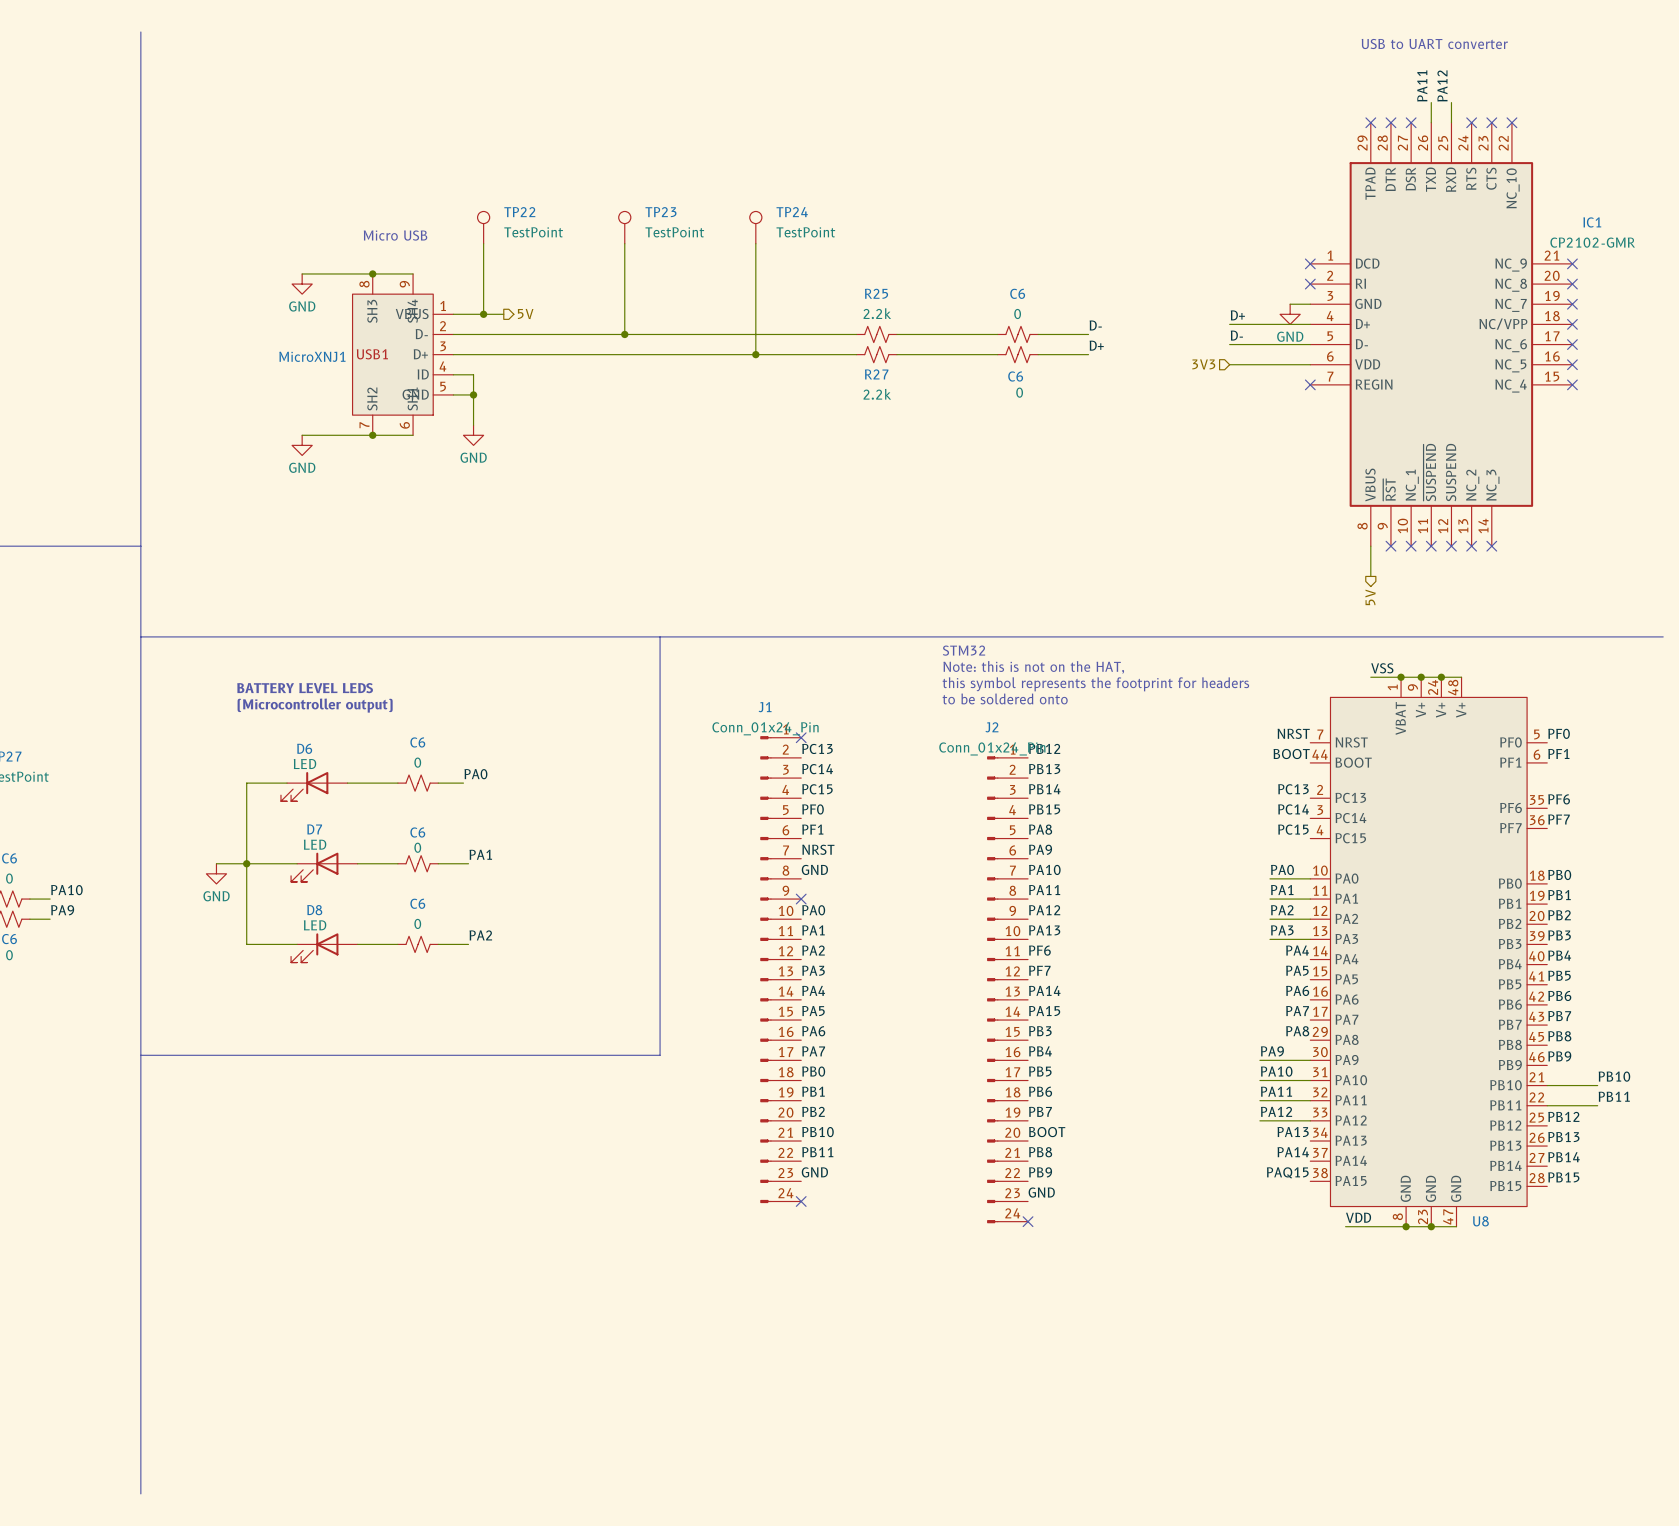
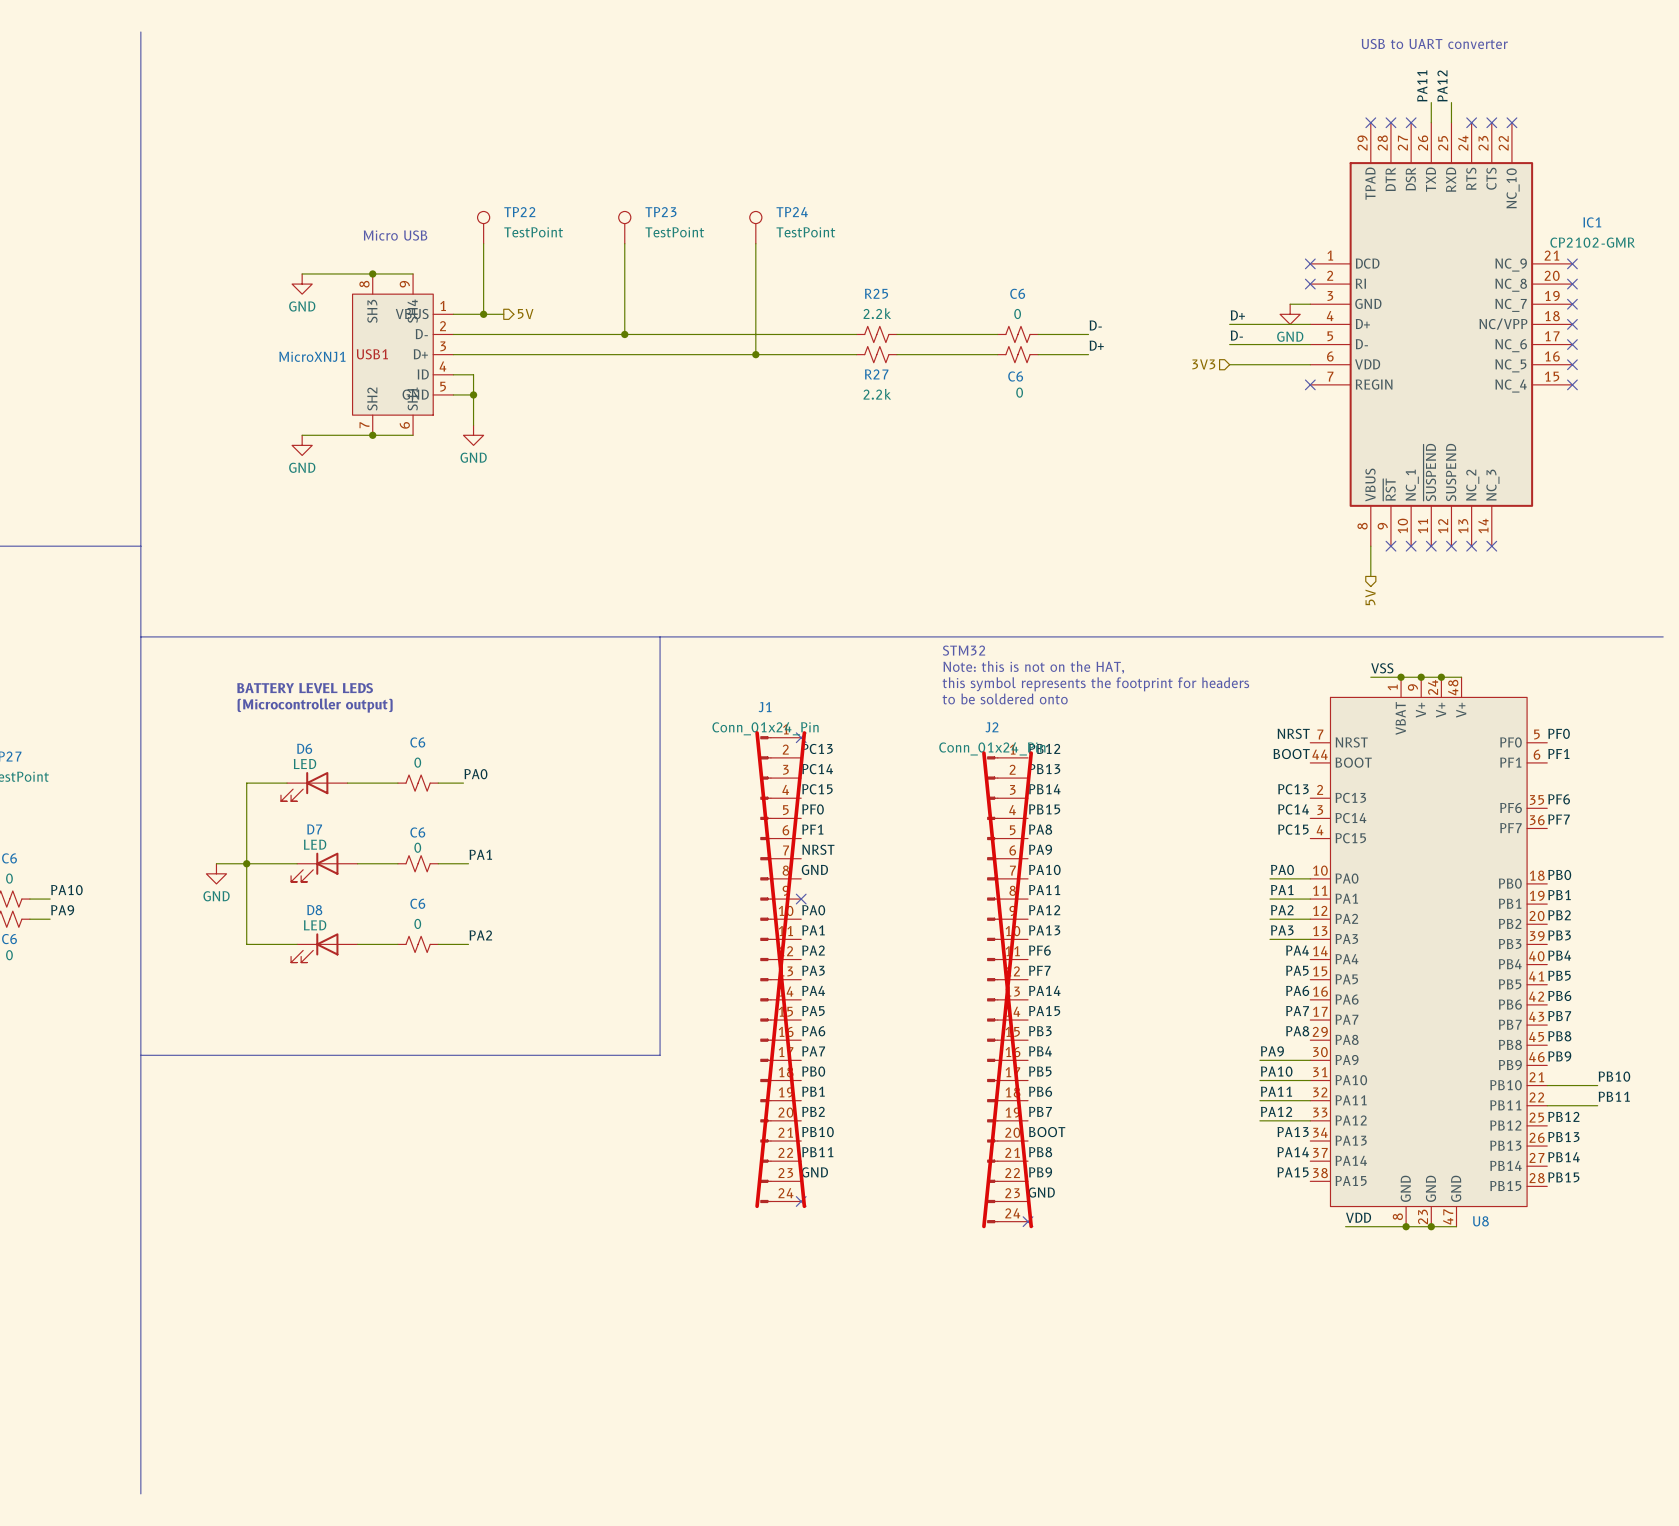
J1 do-not-place cross: none -> (780, 969)
J2 do-not-place cross: none -> (1007, 989)
label: PAQ15 (1287, 1172) -> PA15 (1293, 1172)

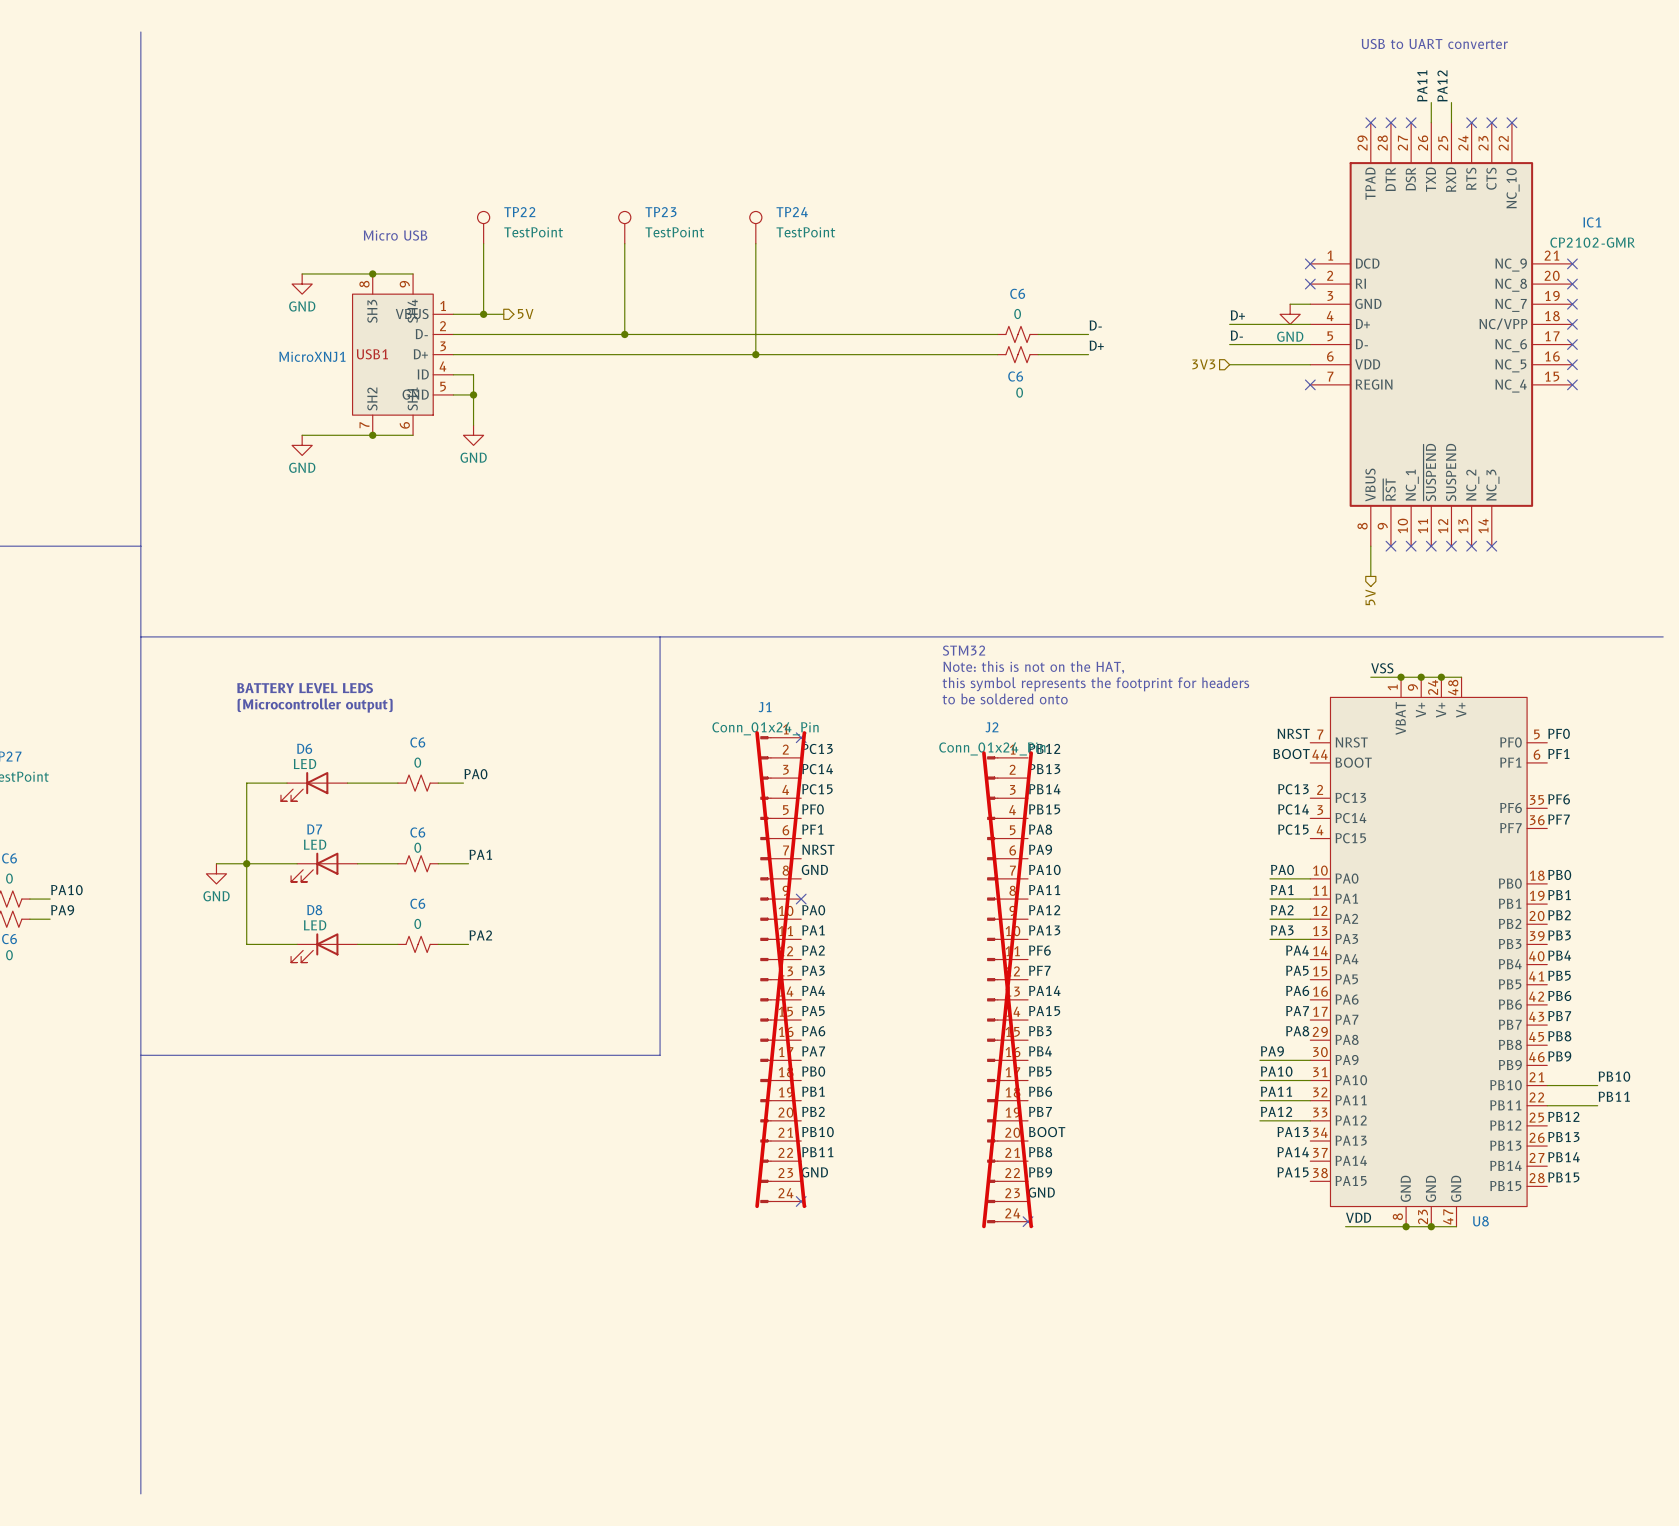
R25: 2.2k (876, 334) -> none
R27: 2.2k (876, 354) -> none

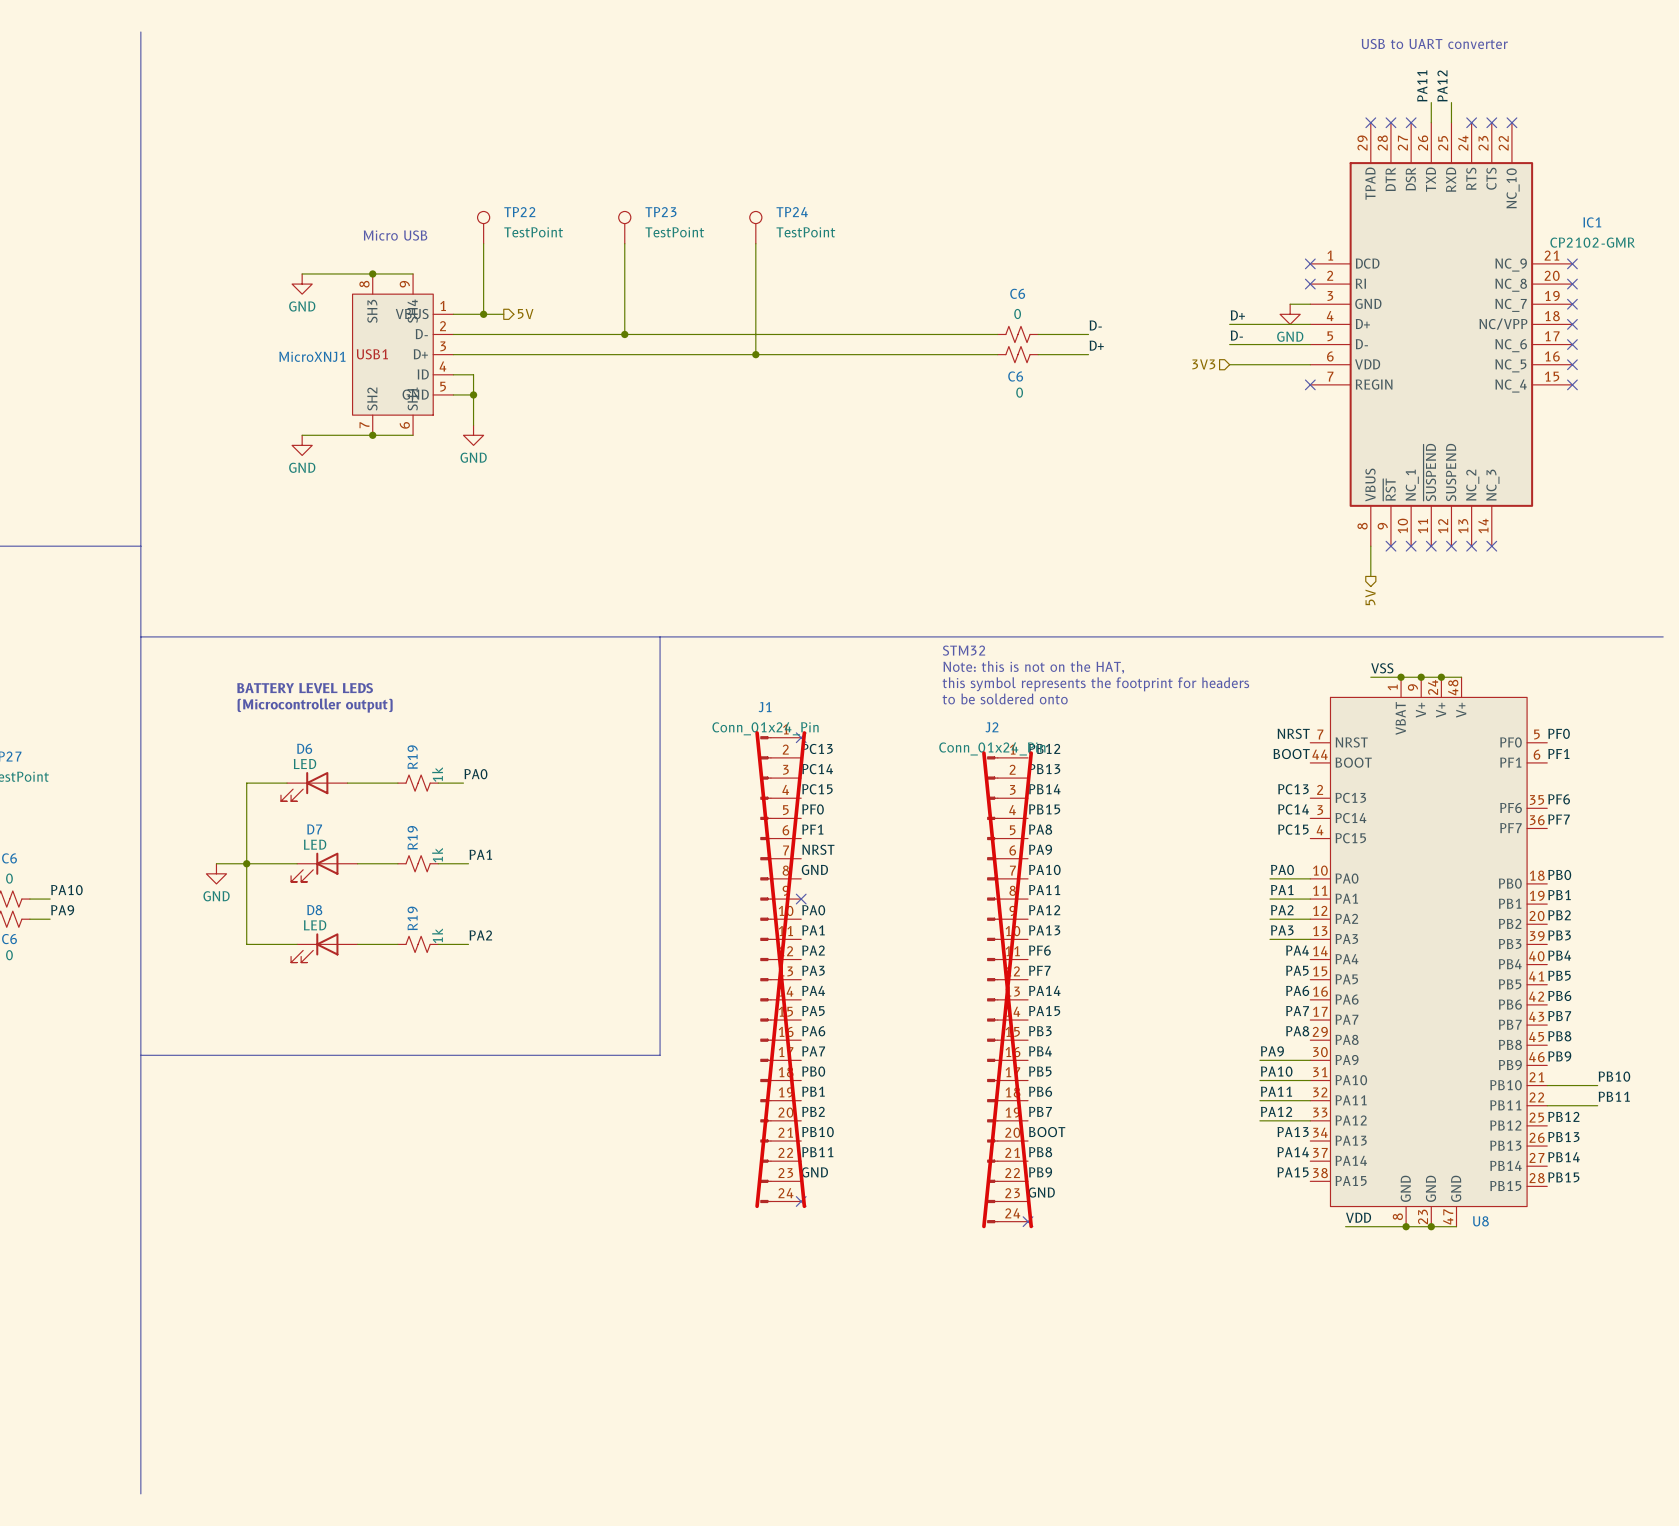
C6 name: C6 (417, 742) -> R19 (412, 757)
C6 value: 0 (417, 762) -> 1k (437, 774)
C6 name: C6 (417, 832) -> R19 (412, 837)
C6 value: 0 (417, 847) -> 1k (437, 855)
C6 name: C6 (417, 903) -> R19 (412, 918)
C6 value: 0 (417, 923) -> 1k (437, 935)

